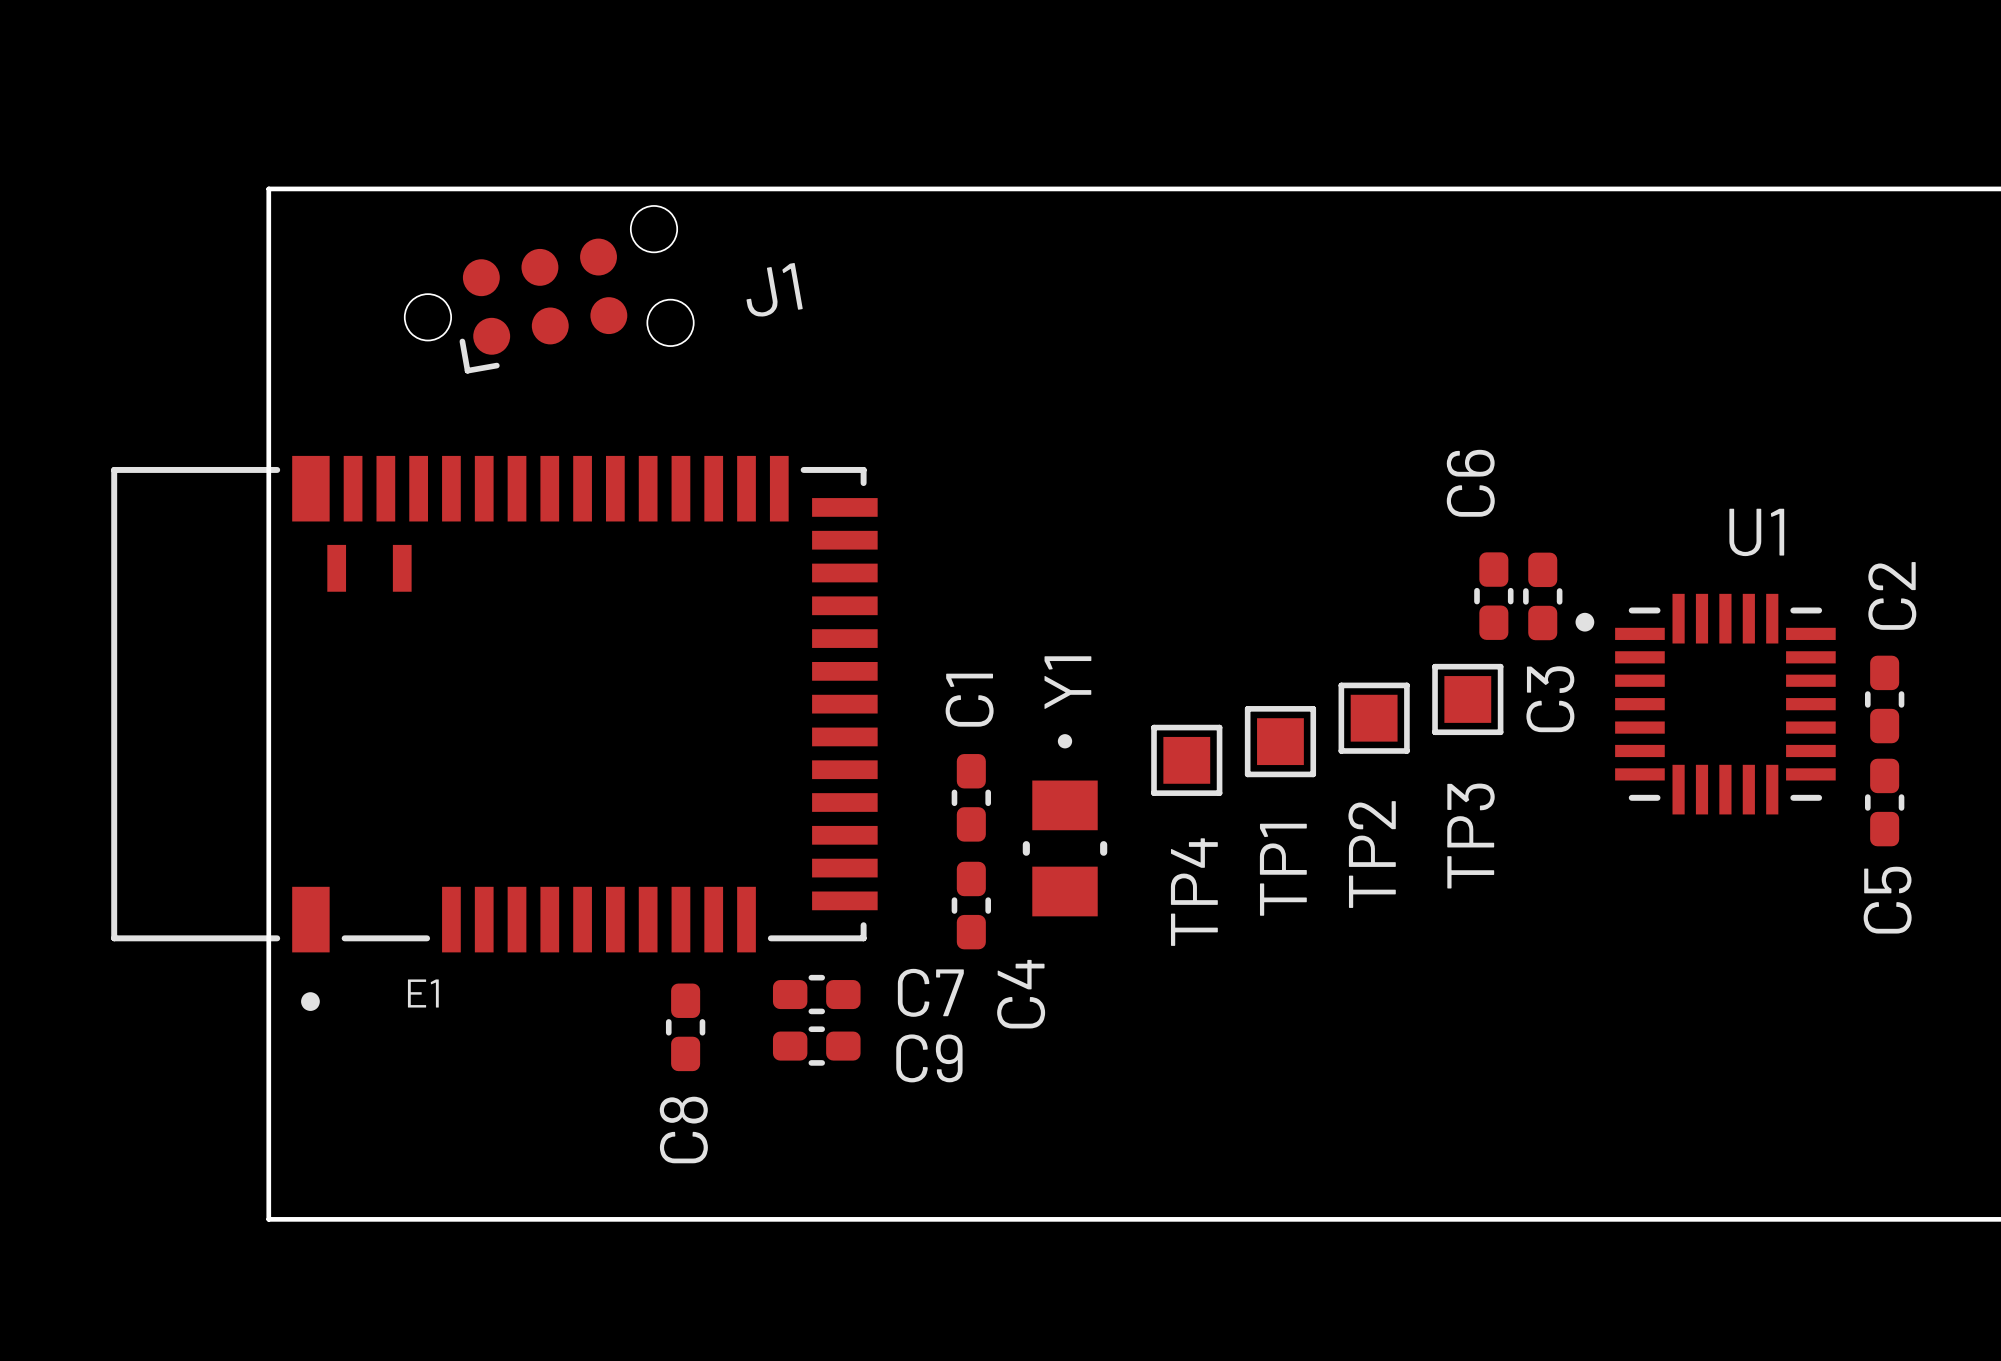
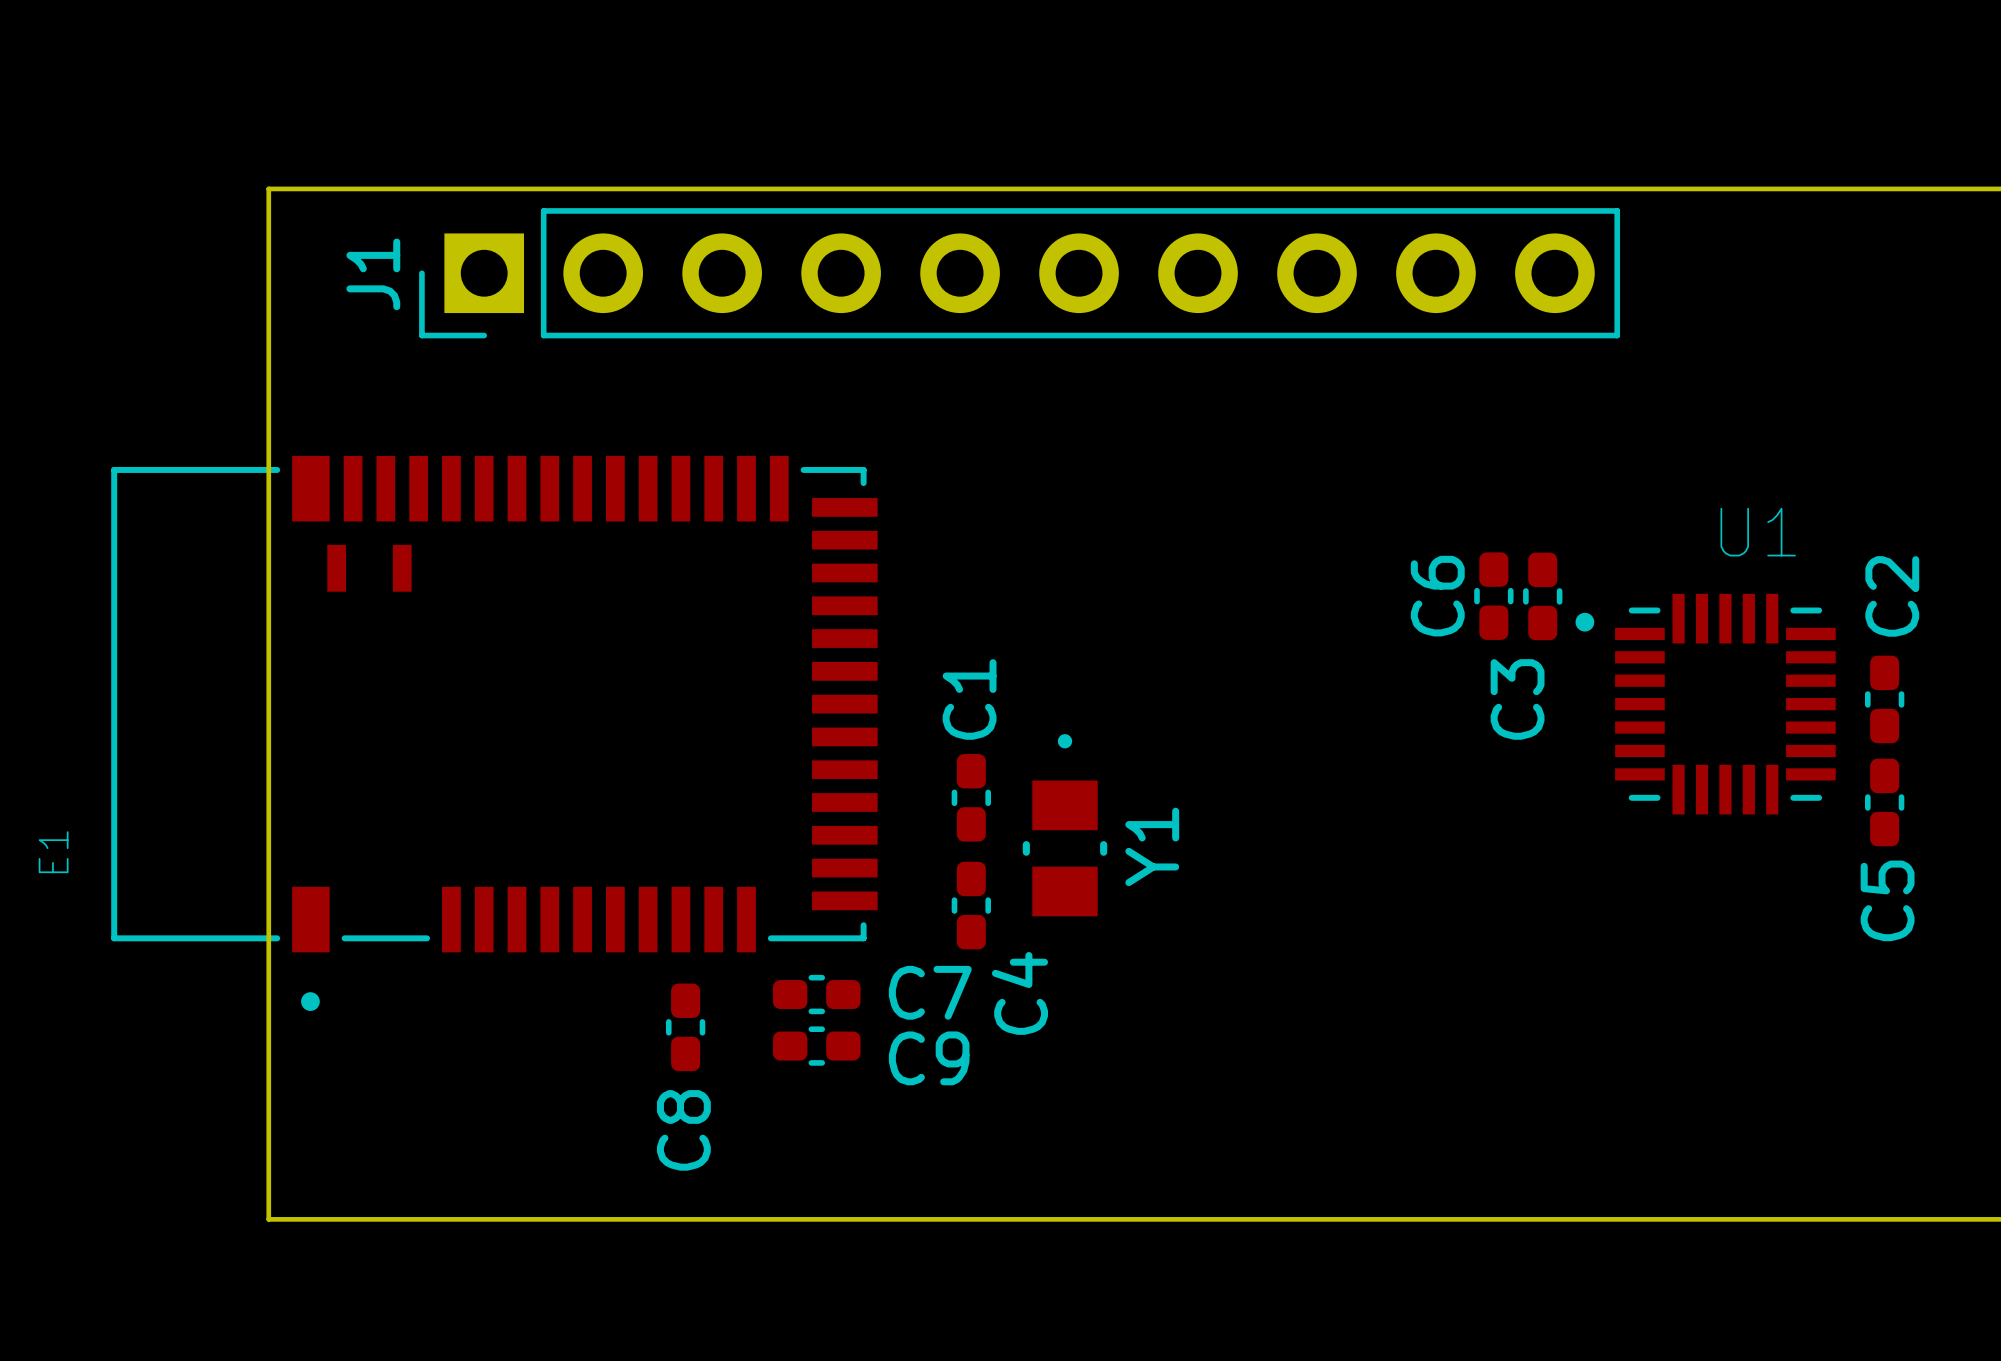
J1 footprint: [404, 205, 694, 374] -> [419, 208, 1621, 339]
J1 name position: J1 (774, 289) -> J1 (373, 274)
C6 name position: C6 (1470, 483) -> C6 (1437, 596)
Y1 name position: Y1 (1067, 682) -> Y1 (1152, 846)
TP3: (1467, 699) -> none
C3 name position: C3 (1550, 699) -> C3 (1517, 699)
TP2: (1374, 718) -> none
TP1: (1280, 741) -> none
TP4: (1186, 760) -> none
E1 name rotation: 0° (423, 993) -> 90° counterclockwise (53, 852)
E1 name position: E1 (423, 993) -> E1 (53, 852)

